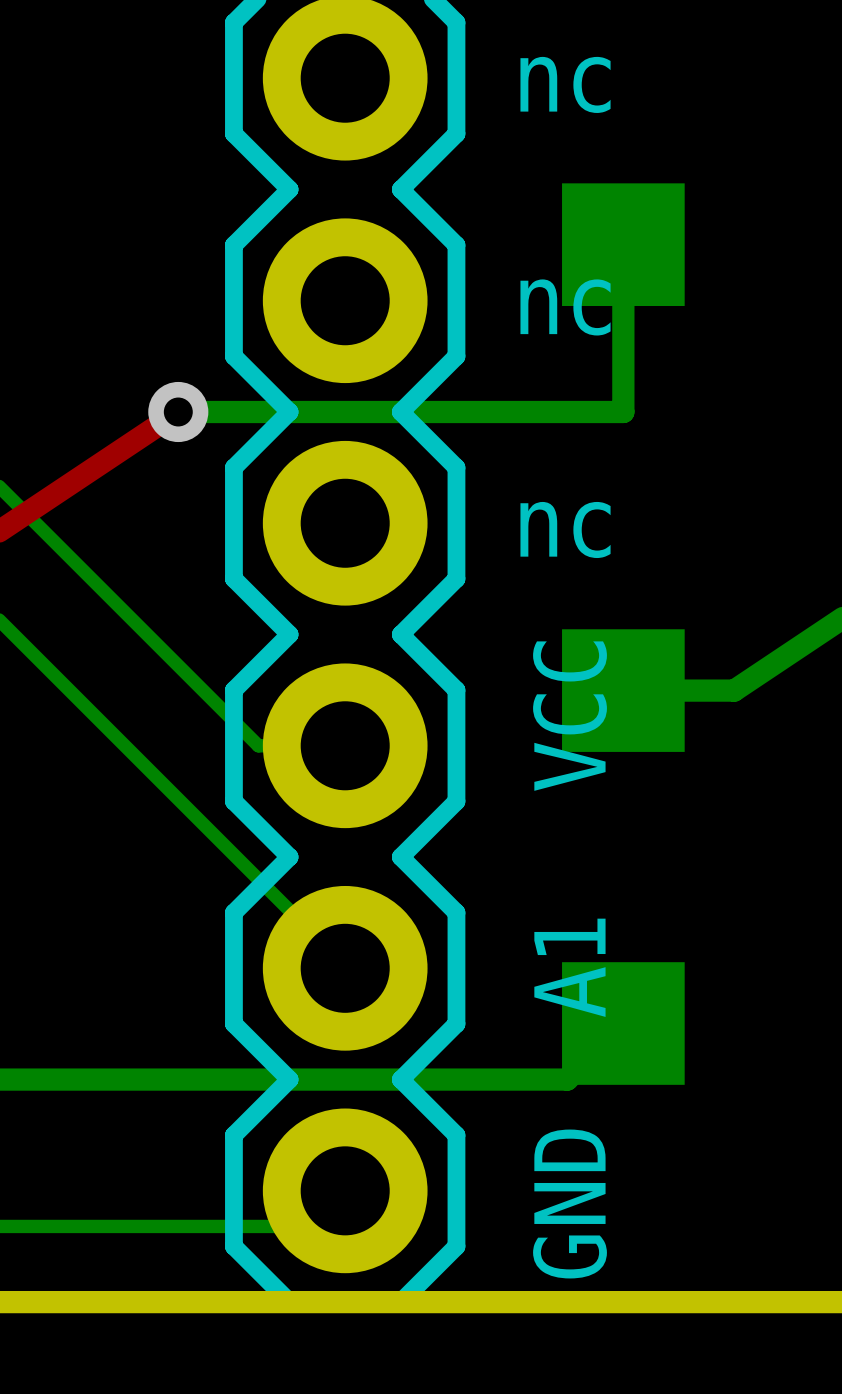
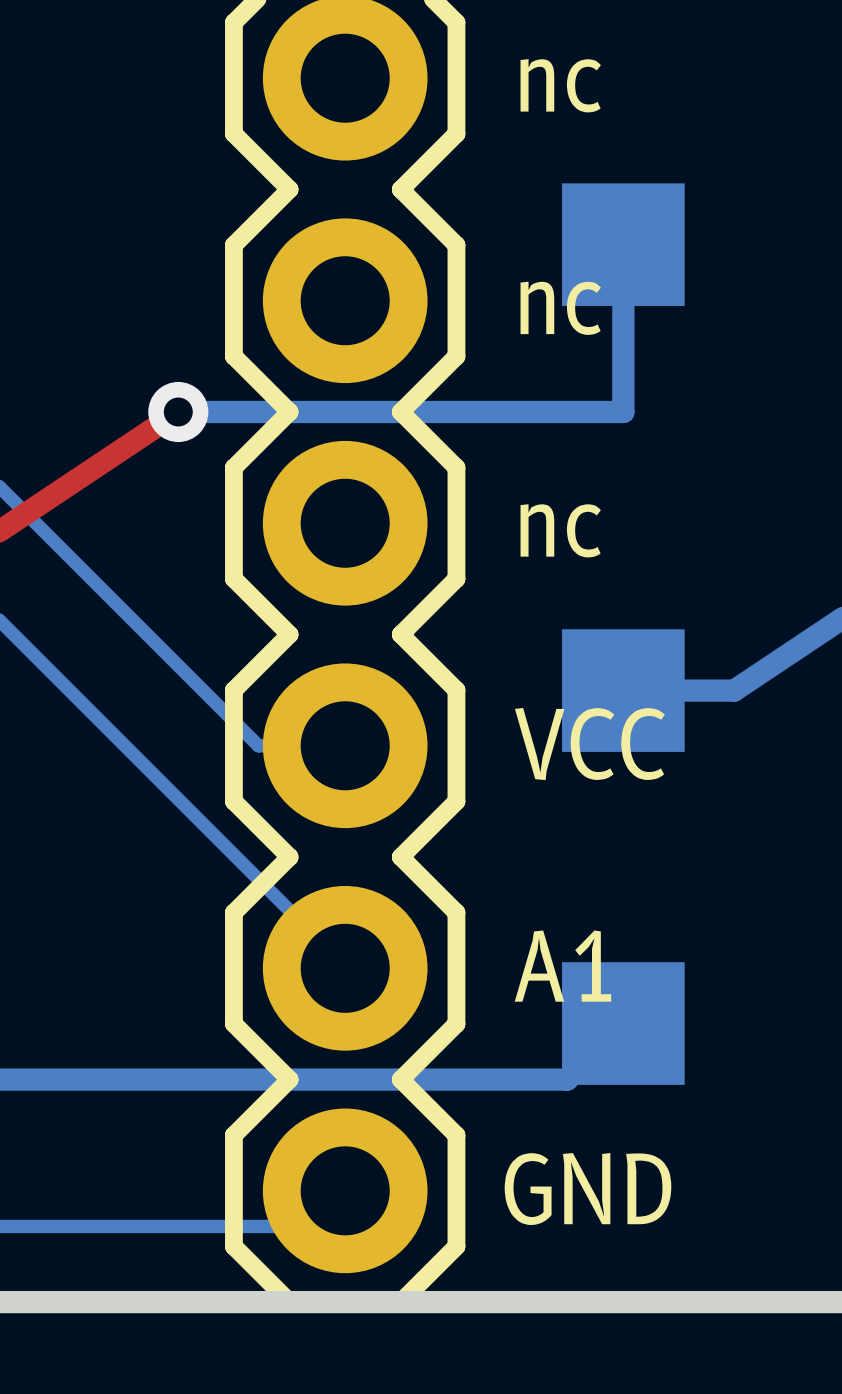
text rotation: 0° (570, 716) -> 90° clockwise (589, 744)
text rotation: 0° (569, 967) -> 90° clockwise (562, 966)
text rotation: 0° (570, 1204) -> 90° clockwise (587, 1189)

